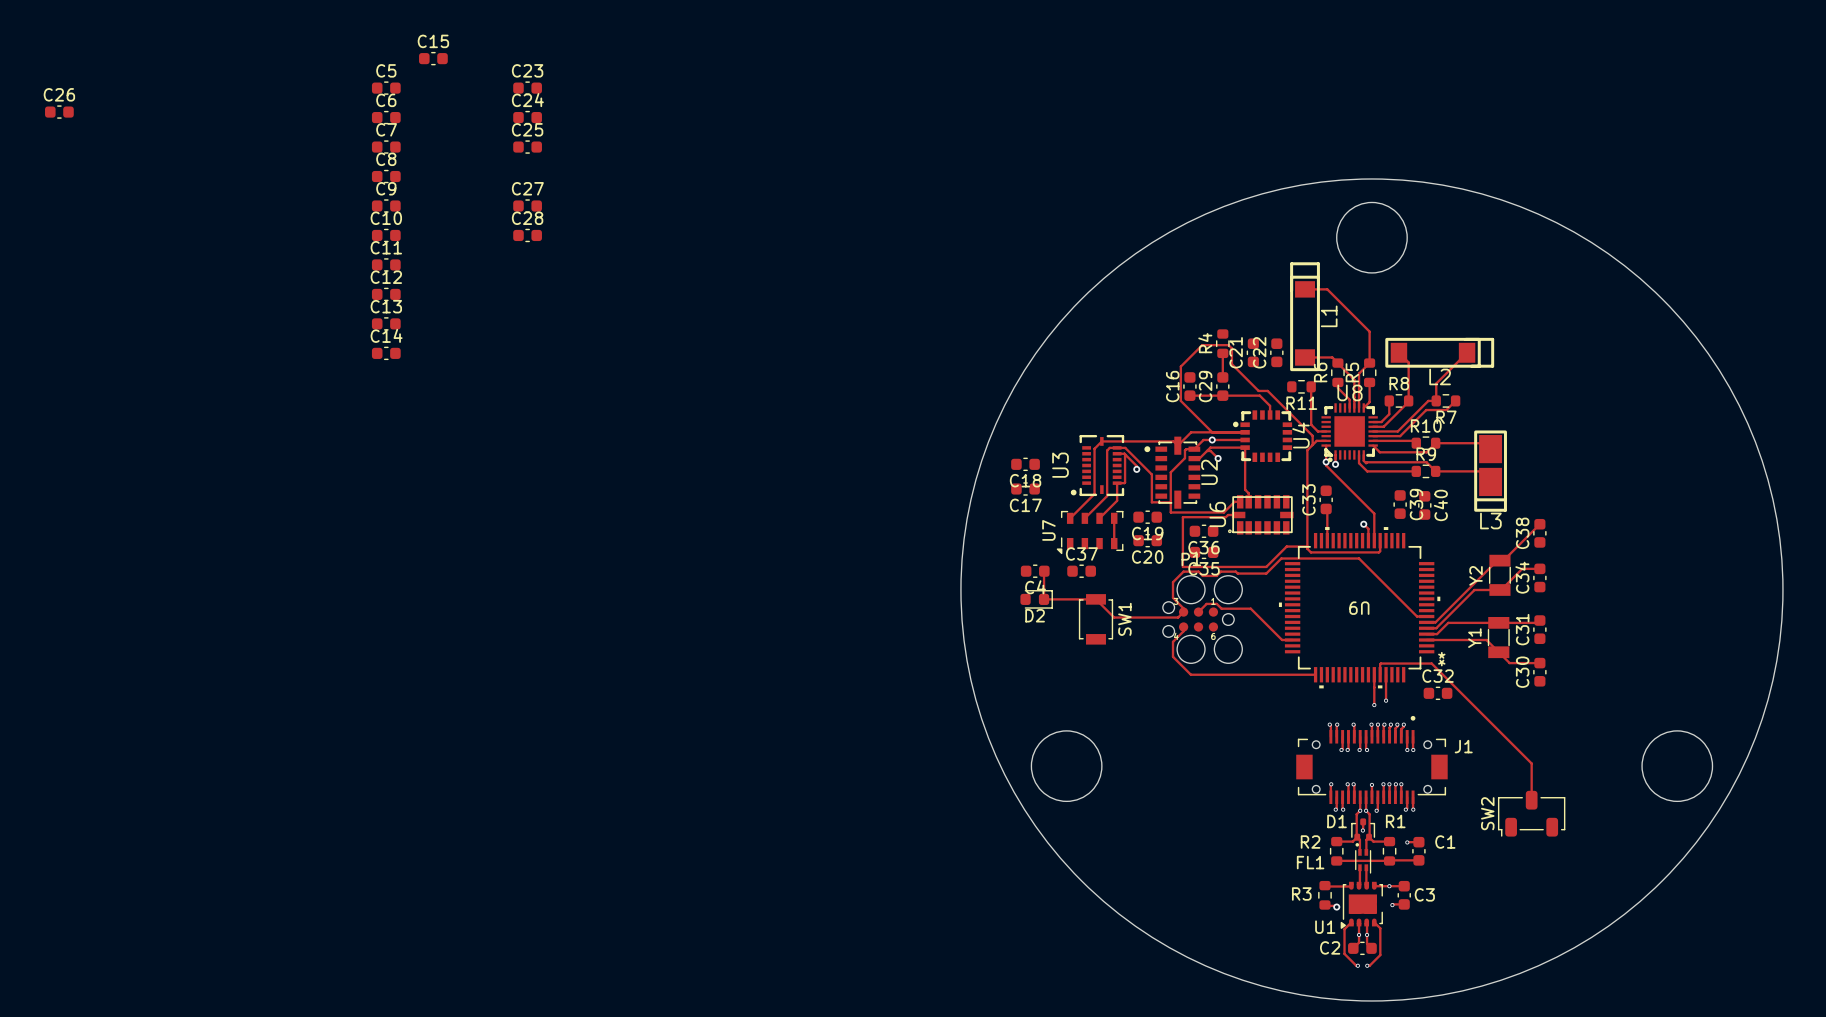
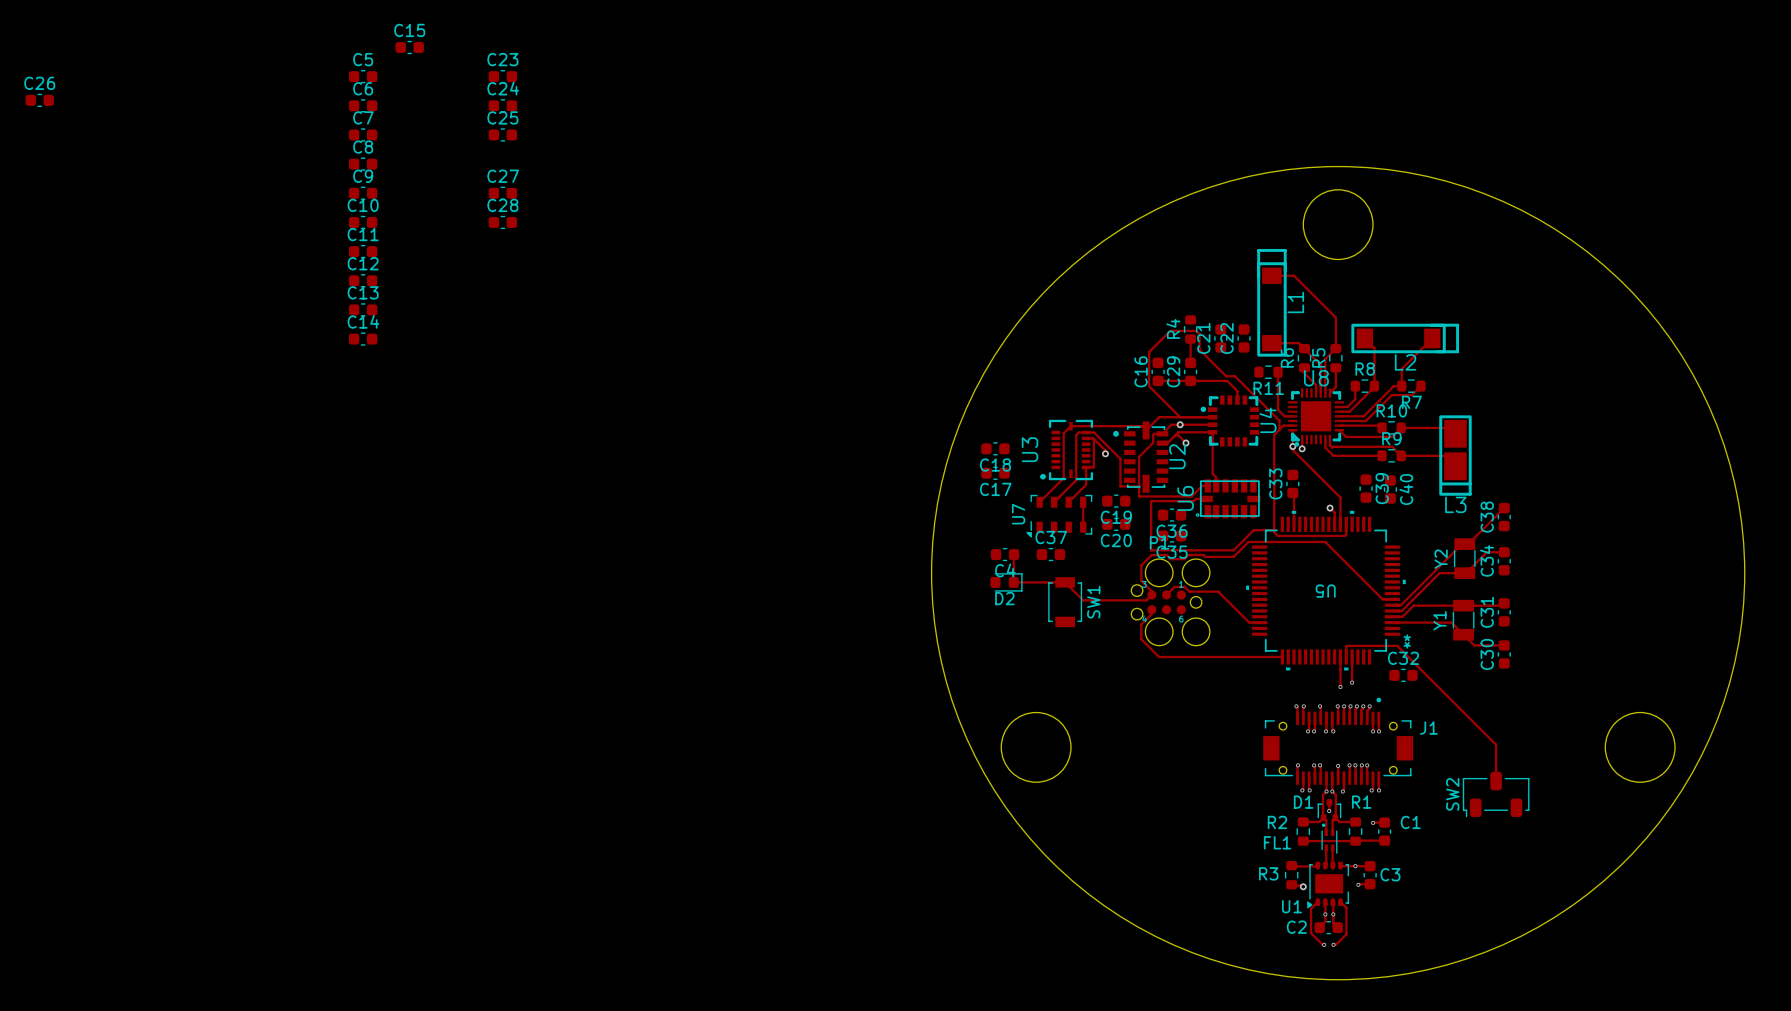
U9 name: U9 (1359, 608) -> U5 (1325, 591)

